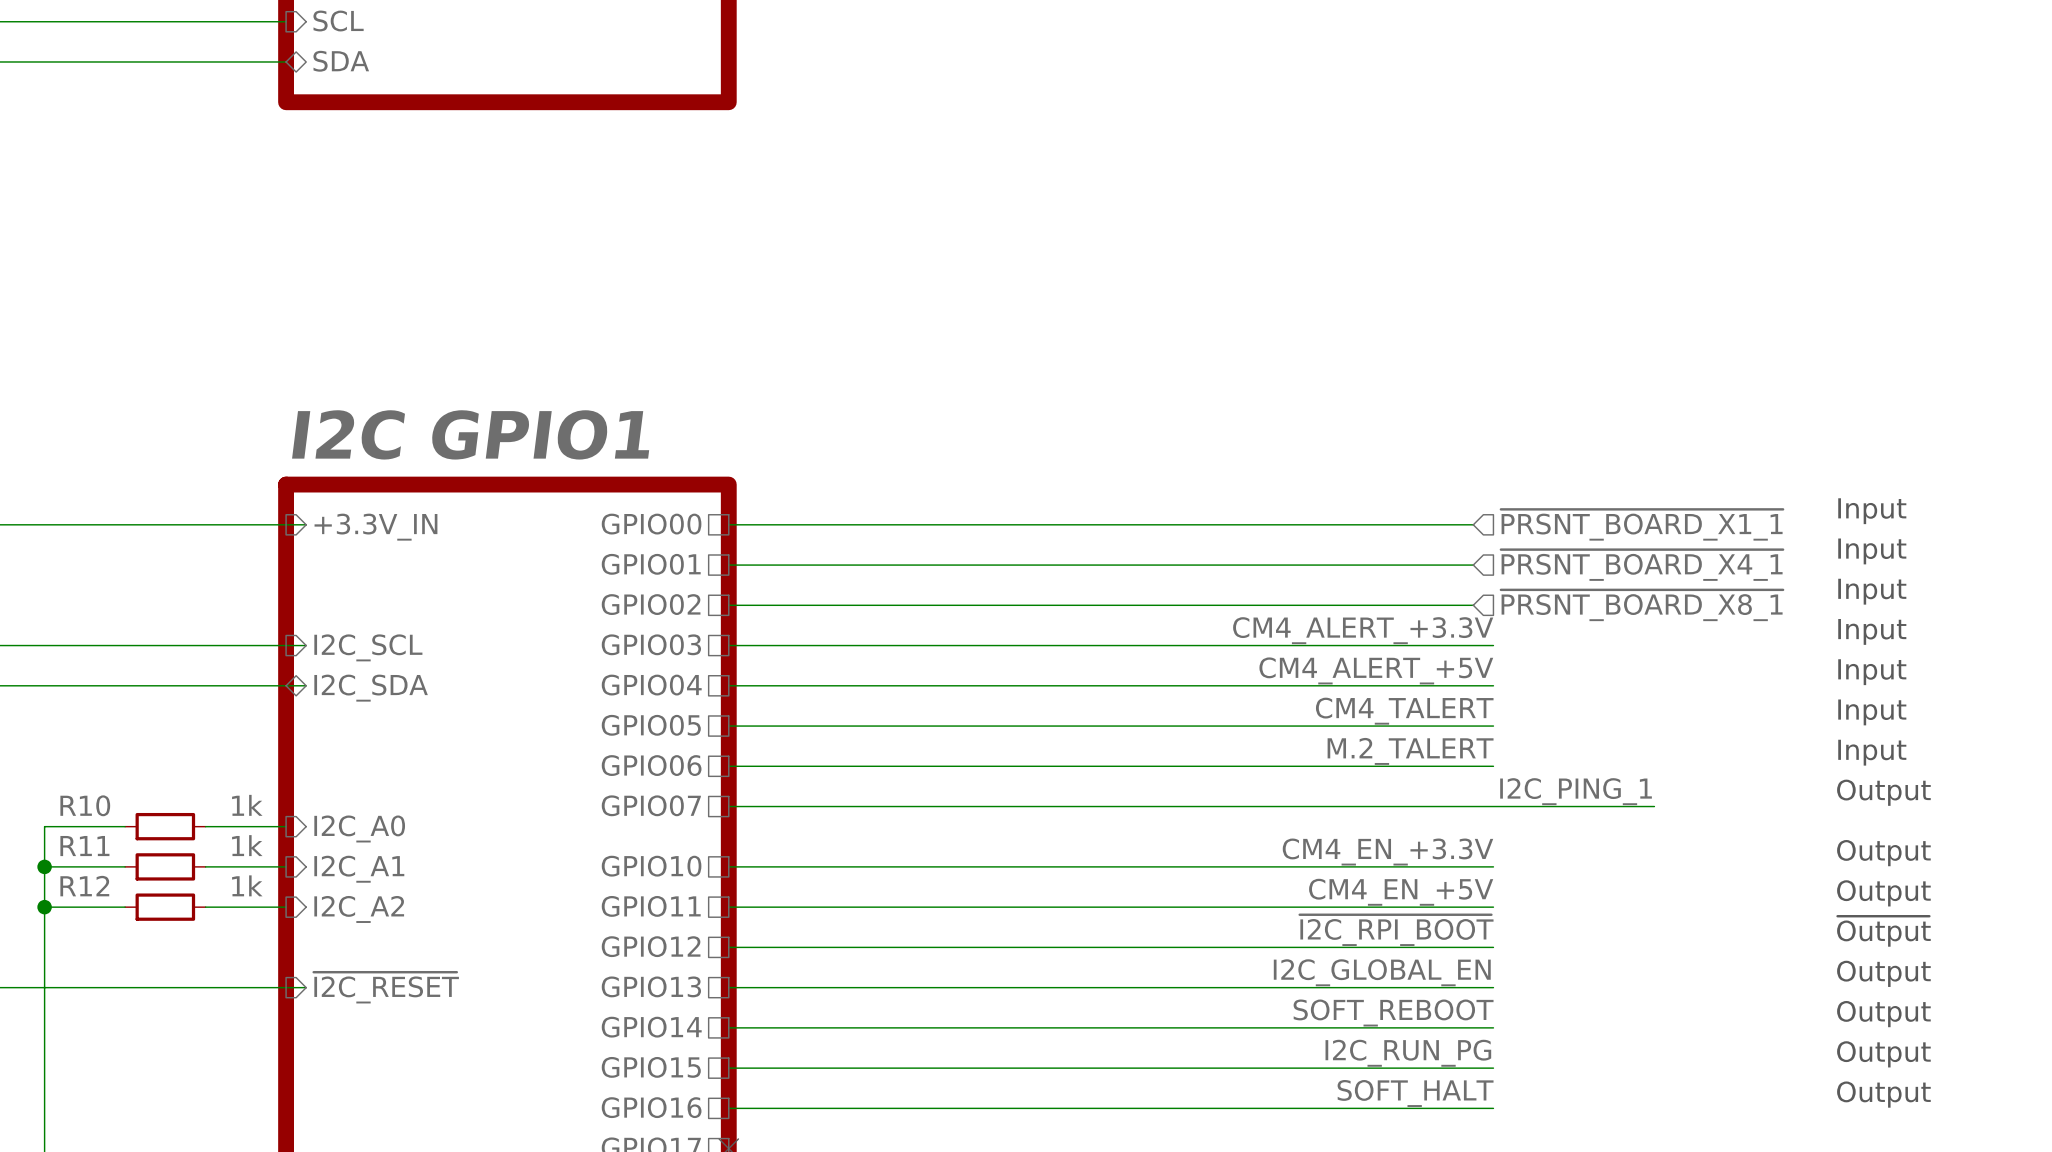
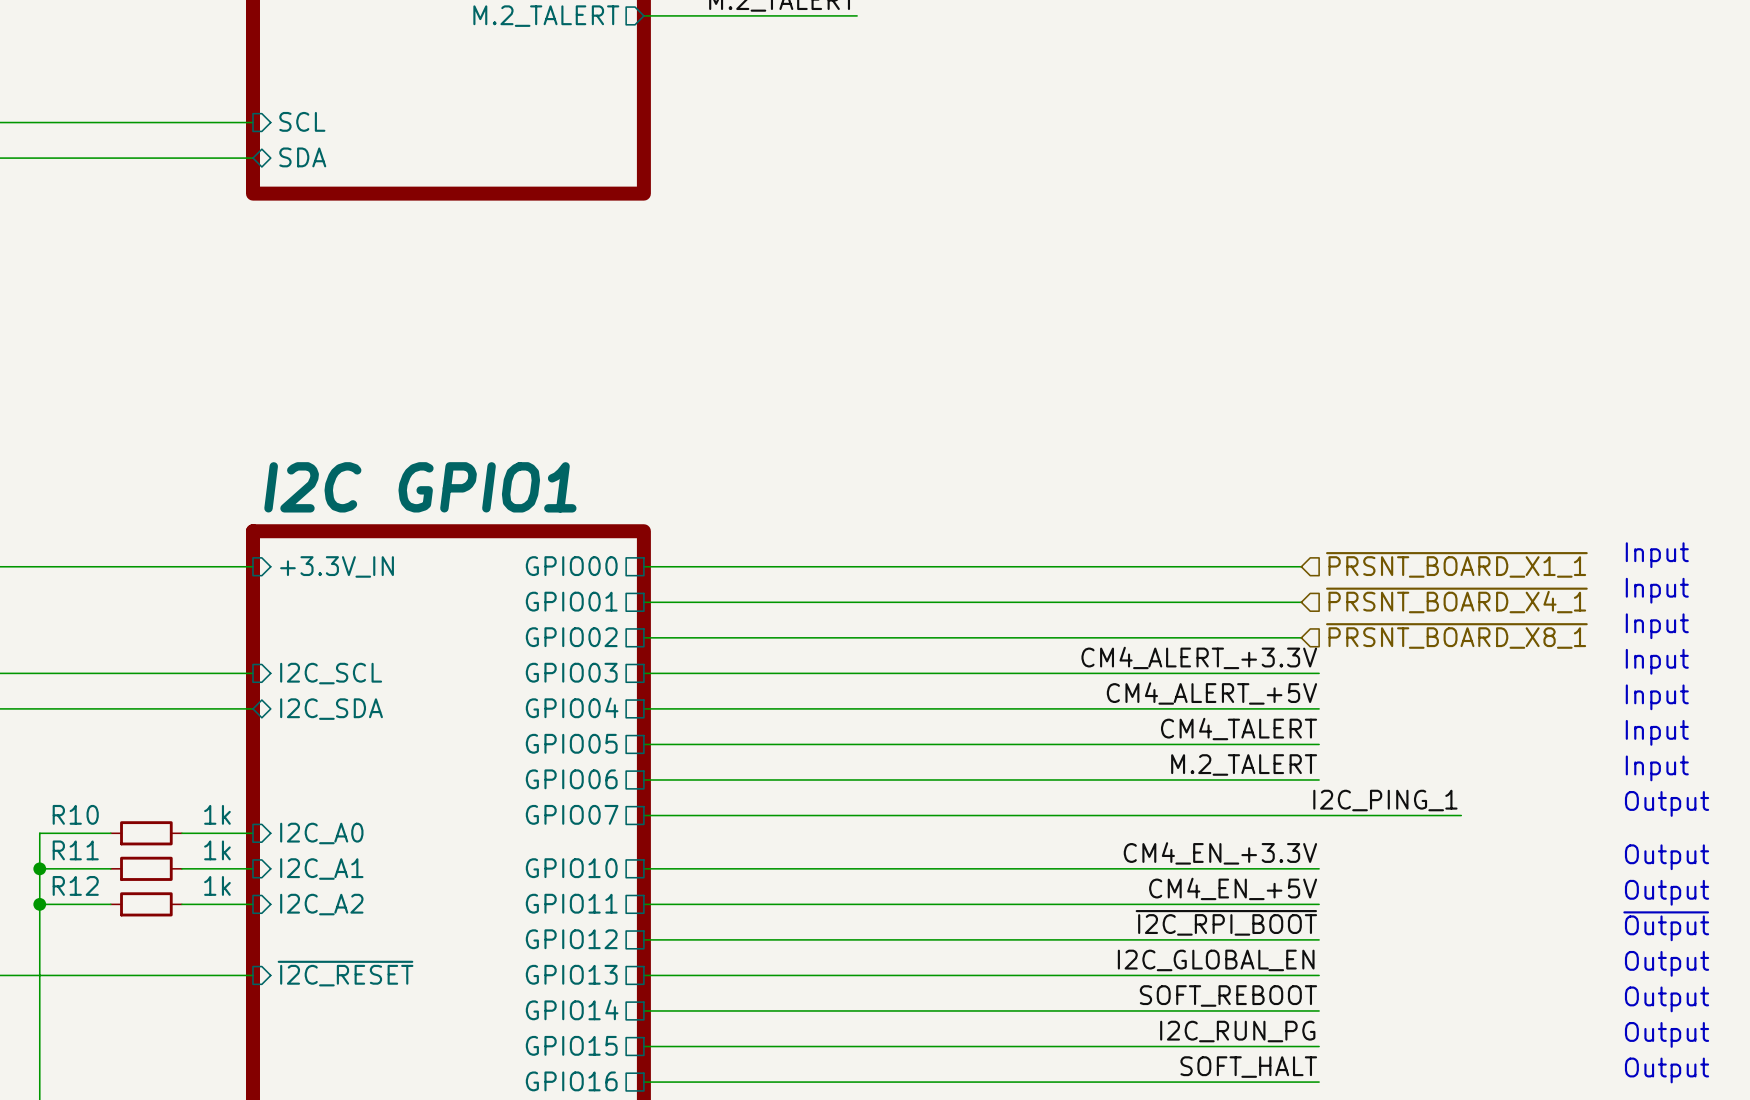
wire: (286, 524) (306, 524) -> none
wire: (286, 645) (306, 645) -> none
wire: (286, 685) (306, 685) -> none
wire: (286, 987) (306, 987) -> none

